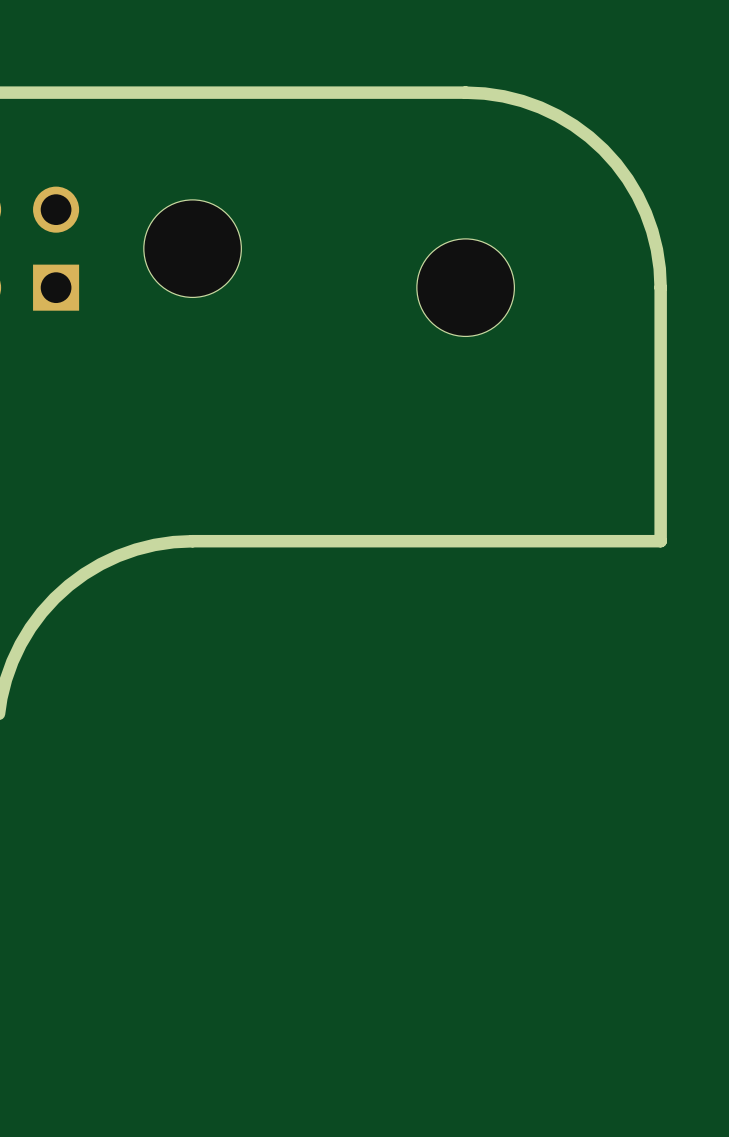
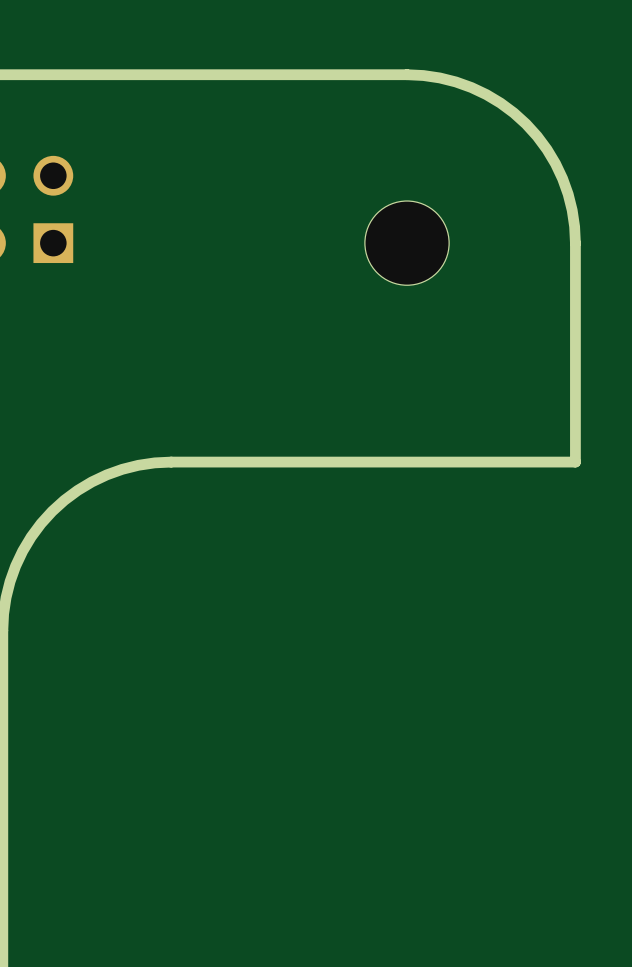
hole: (192, 248) -> none

